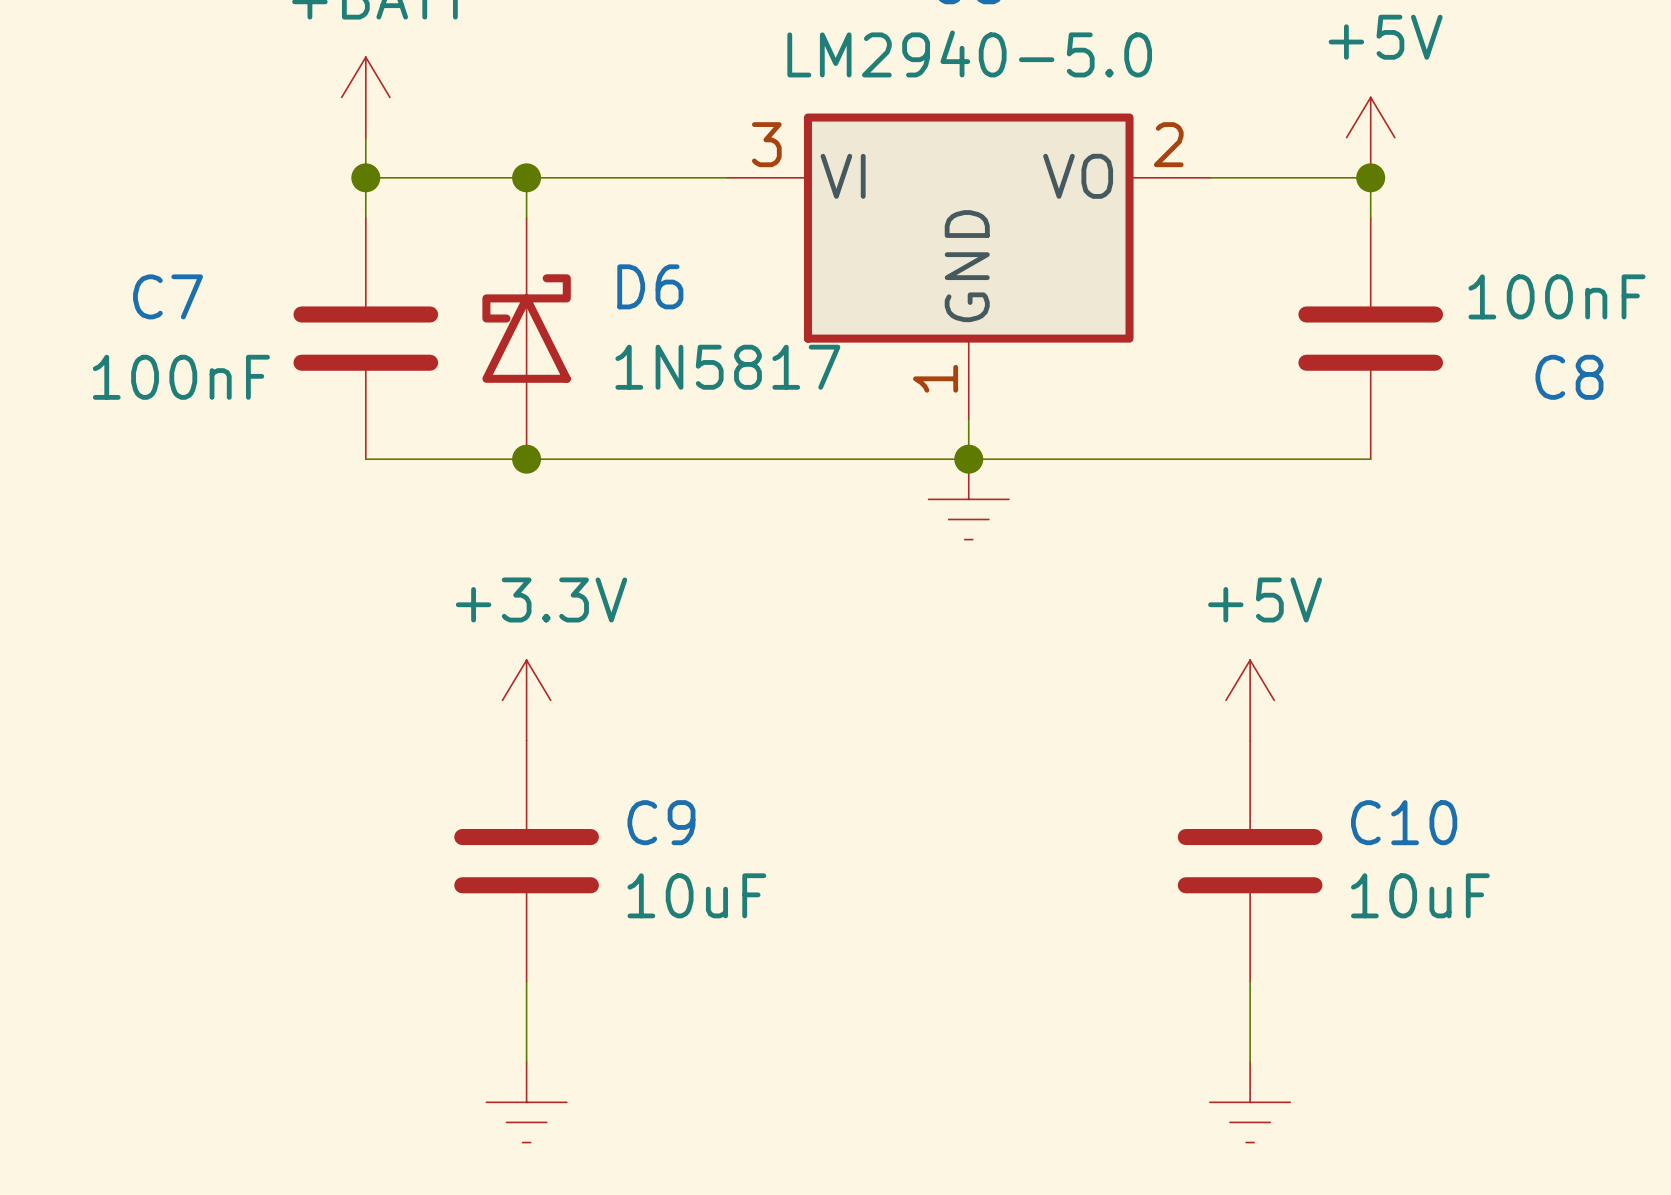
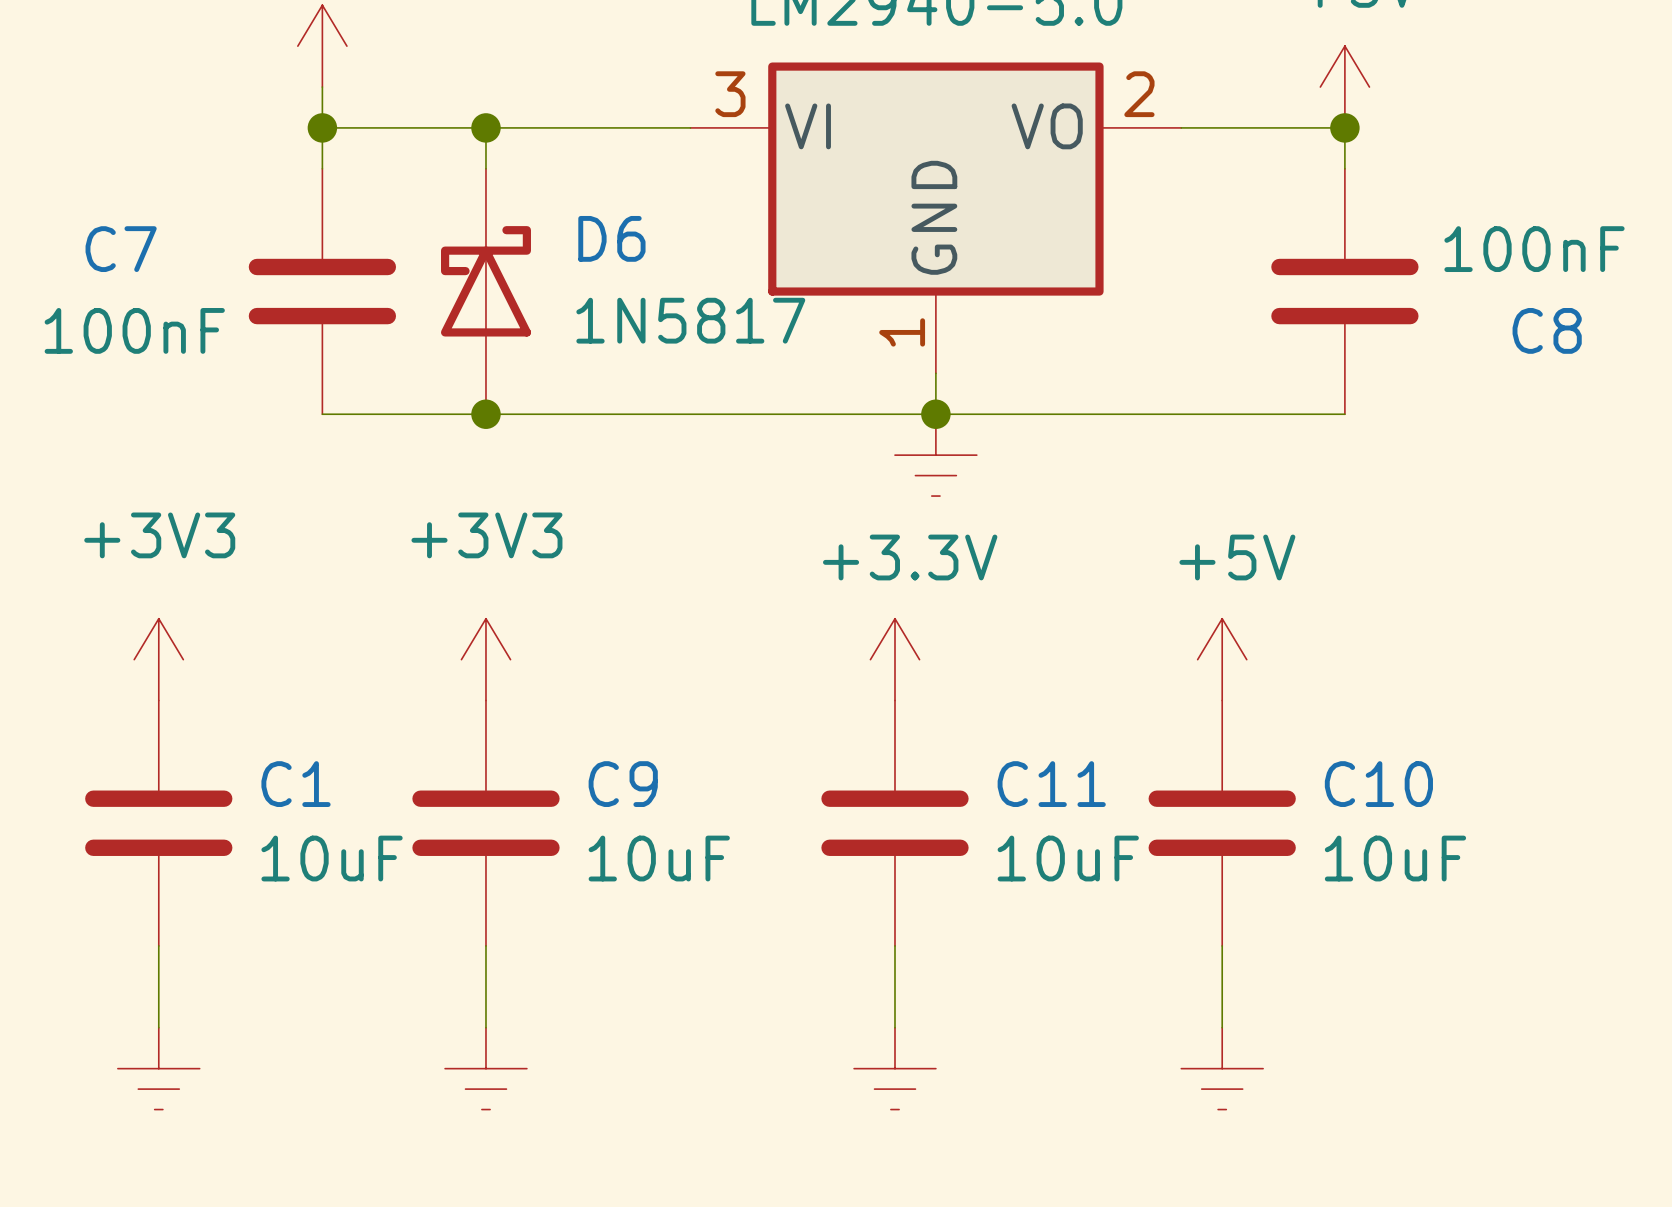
power symbol: none -> +3V3 (158, 659)
power symbol: +3.3V (526, 700) -> +3V3 (485, 659)
power symbol: none -> +3.3V (894, 659)
C1: none -> 10uF (158, 823)
C11: none -> 10uF (894, 823)
wire: none -> (158, 945) (158, 1027)
wire: none -> (894, 945) (894, 1027)
power symbol: none -> (158, 1068)
power symbol: none -> (894, 1068)

